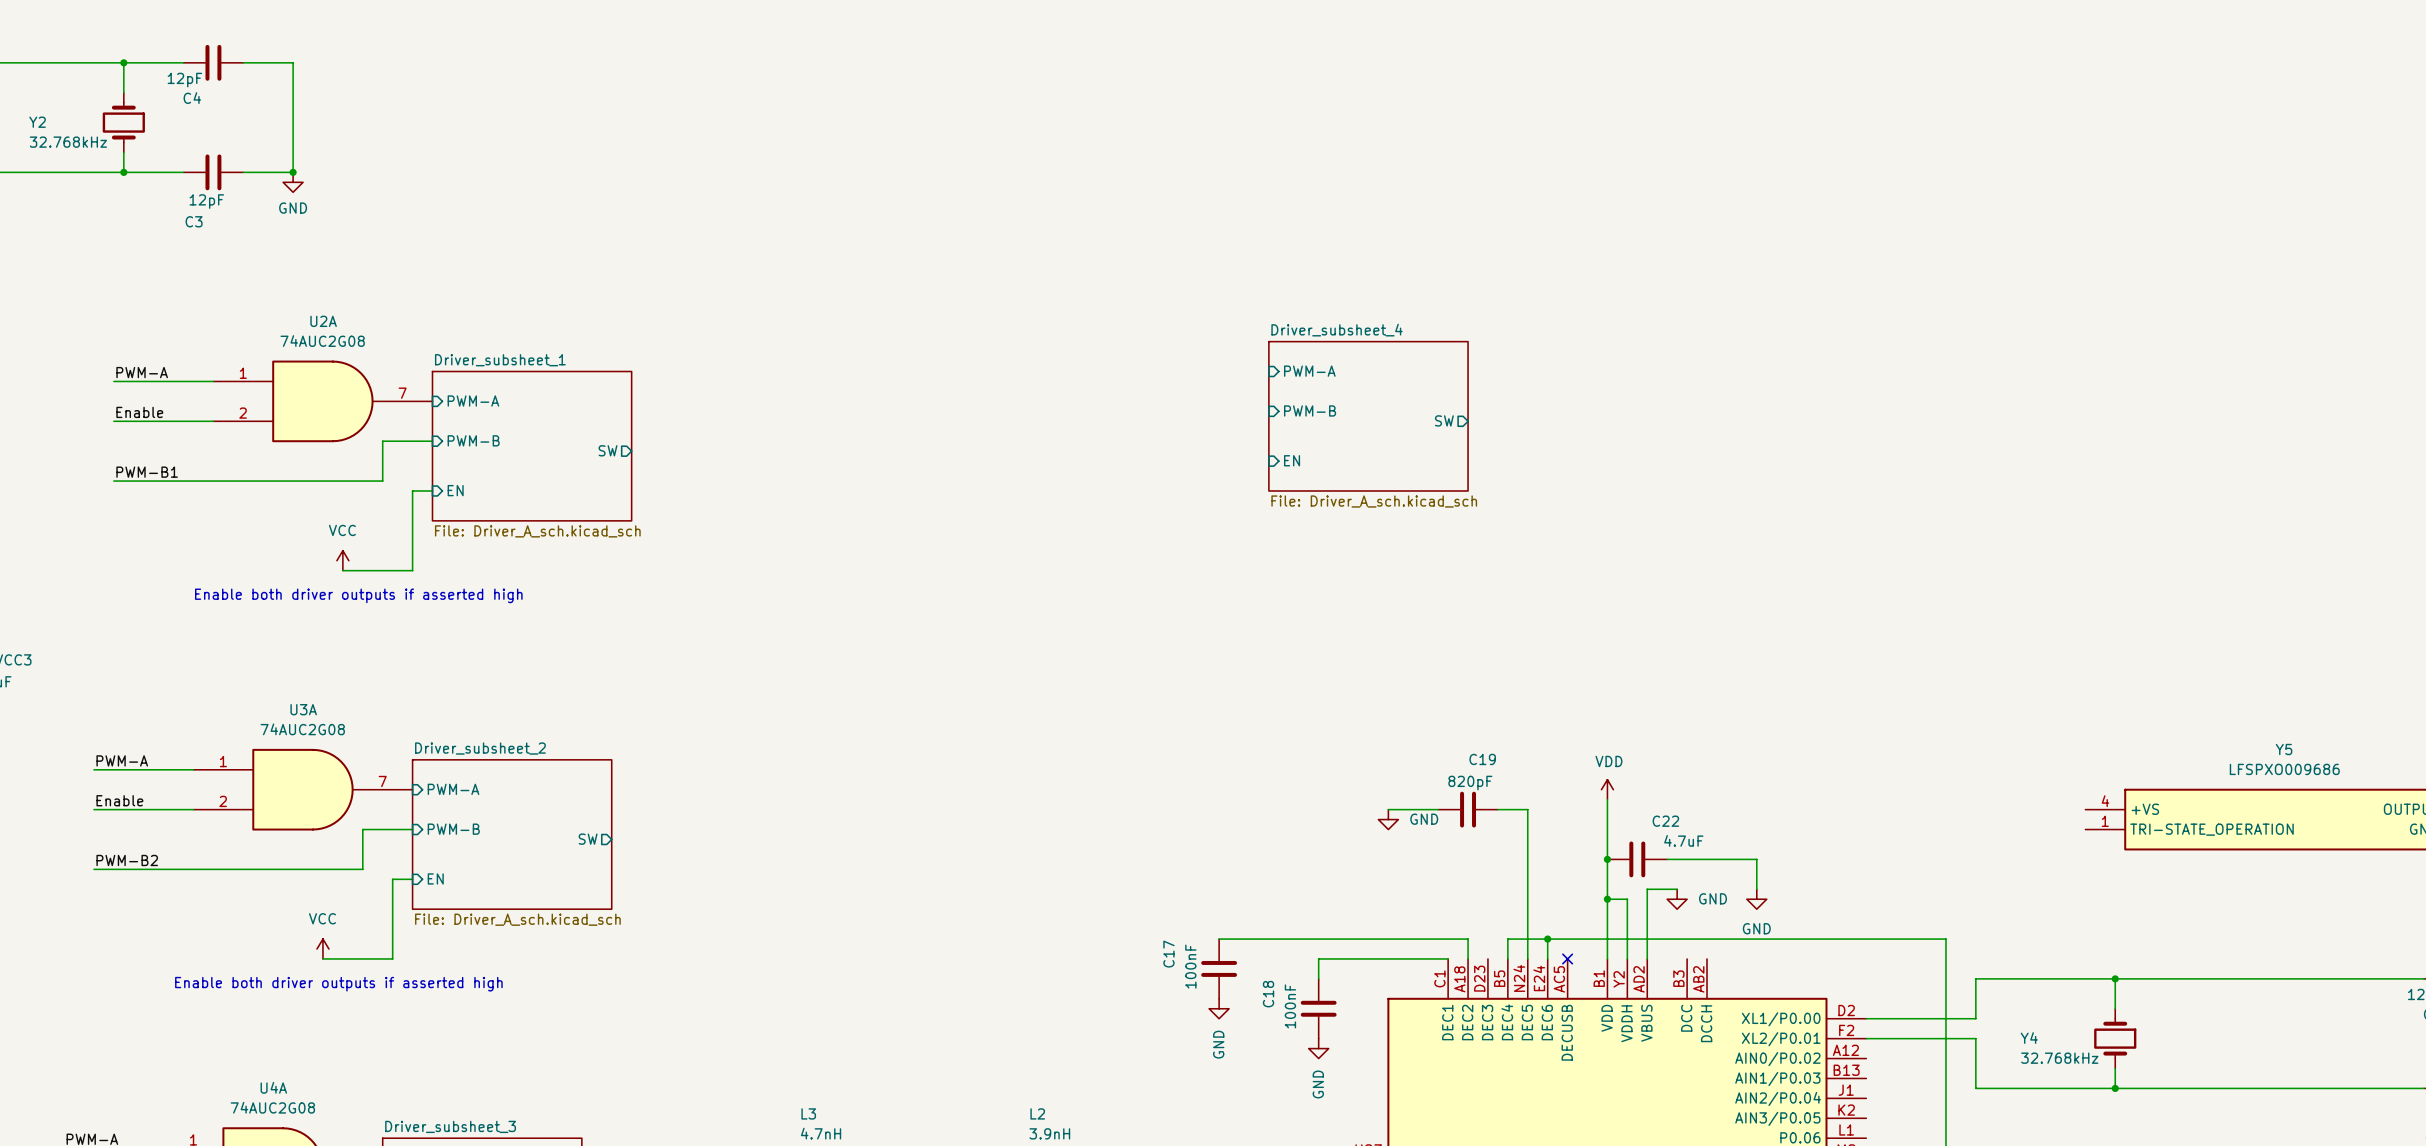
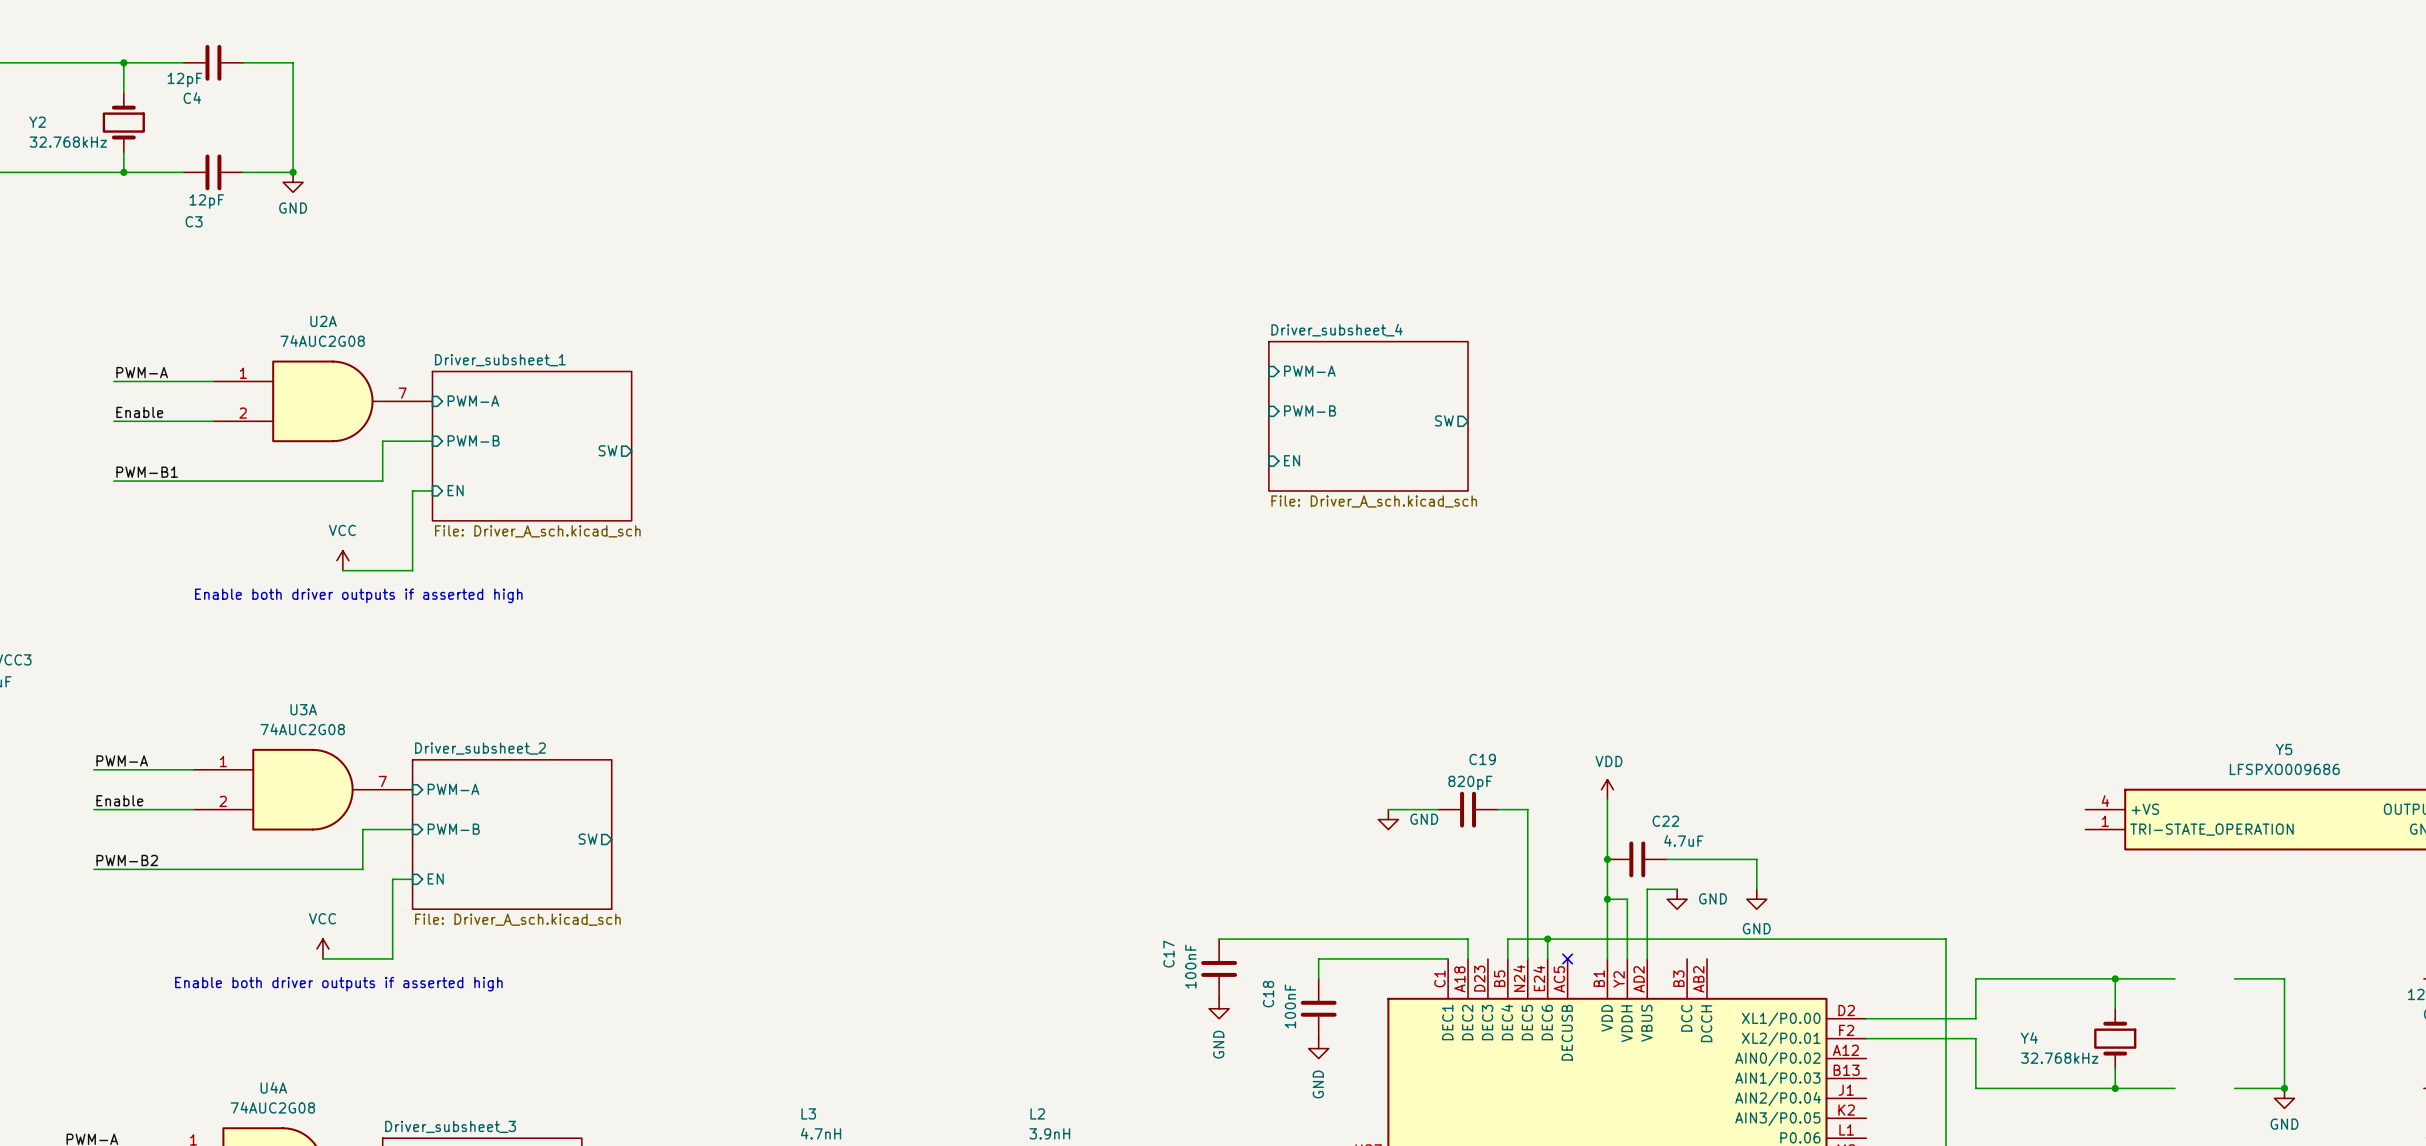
wire: (2174, 978) (2234, 978) -> none
wire: (2284, 978) (2423, 978) -> (2284, 978) (2284, 1088)
wire: (2174, 1088) (2234, 1088) -> none
wire: (2284, 1088) (2423, 1088) -> none
junction: none -> (2284, 1088)
power symbol: none -> GND (2284, 1098)

